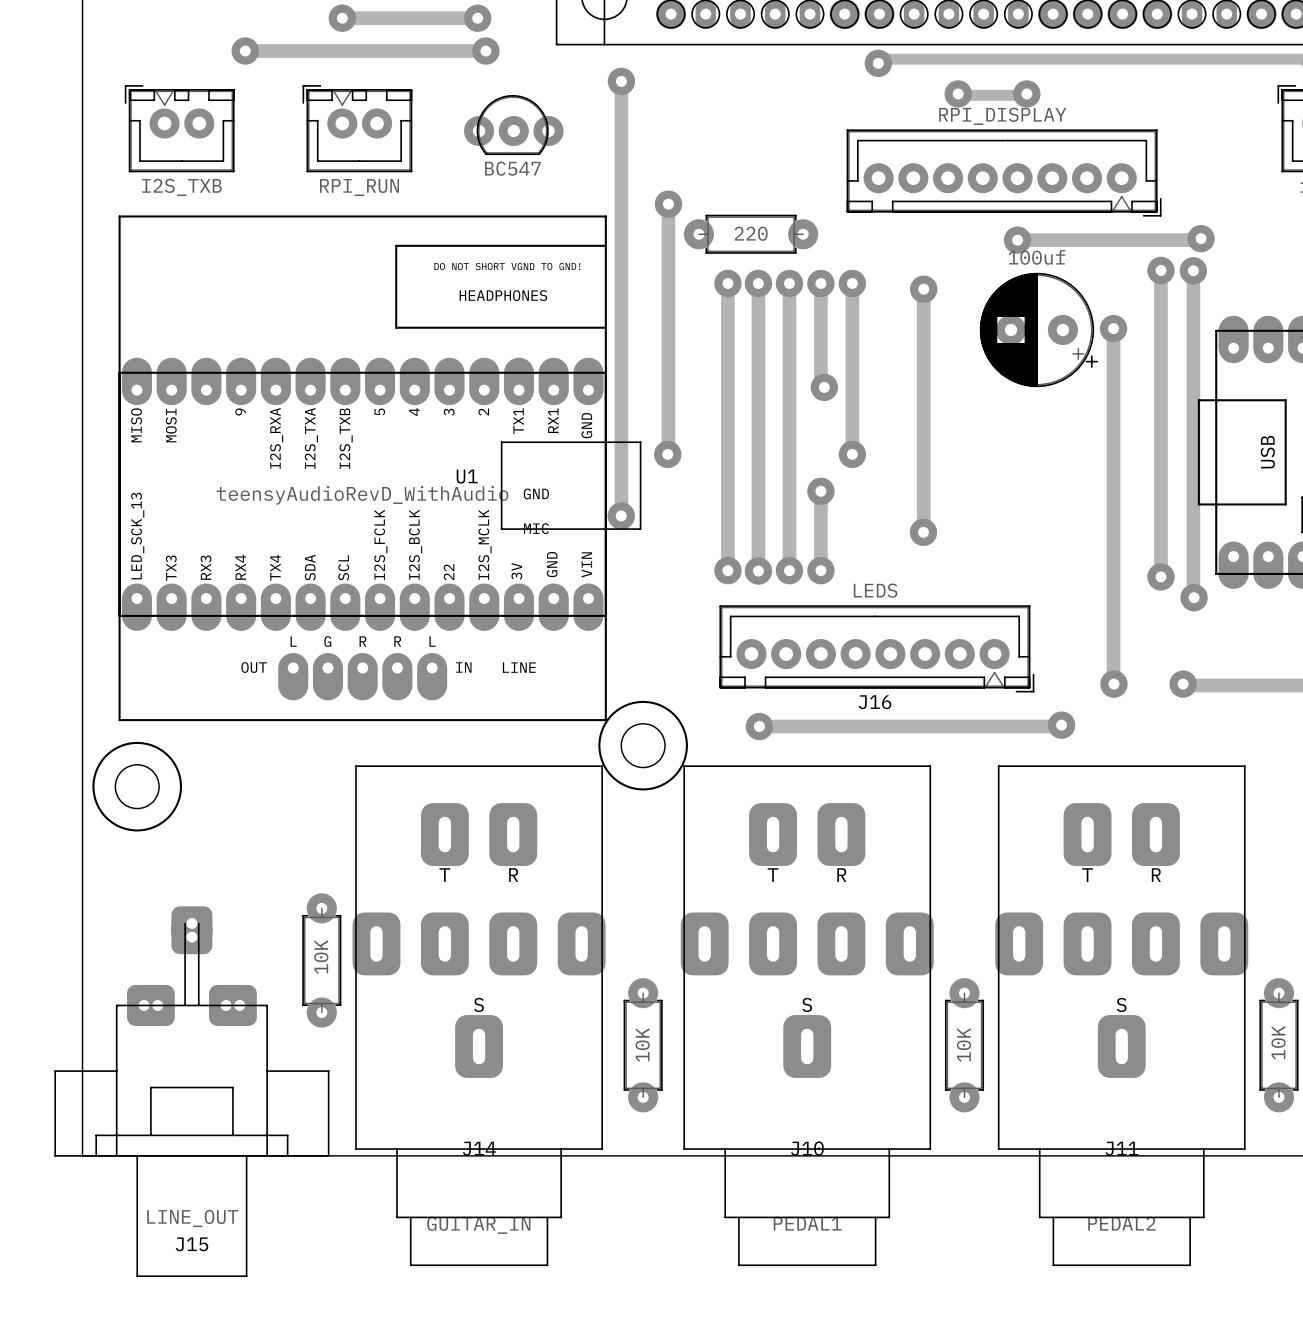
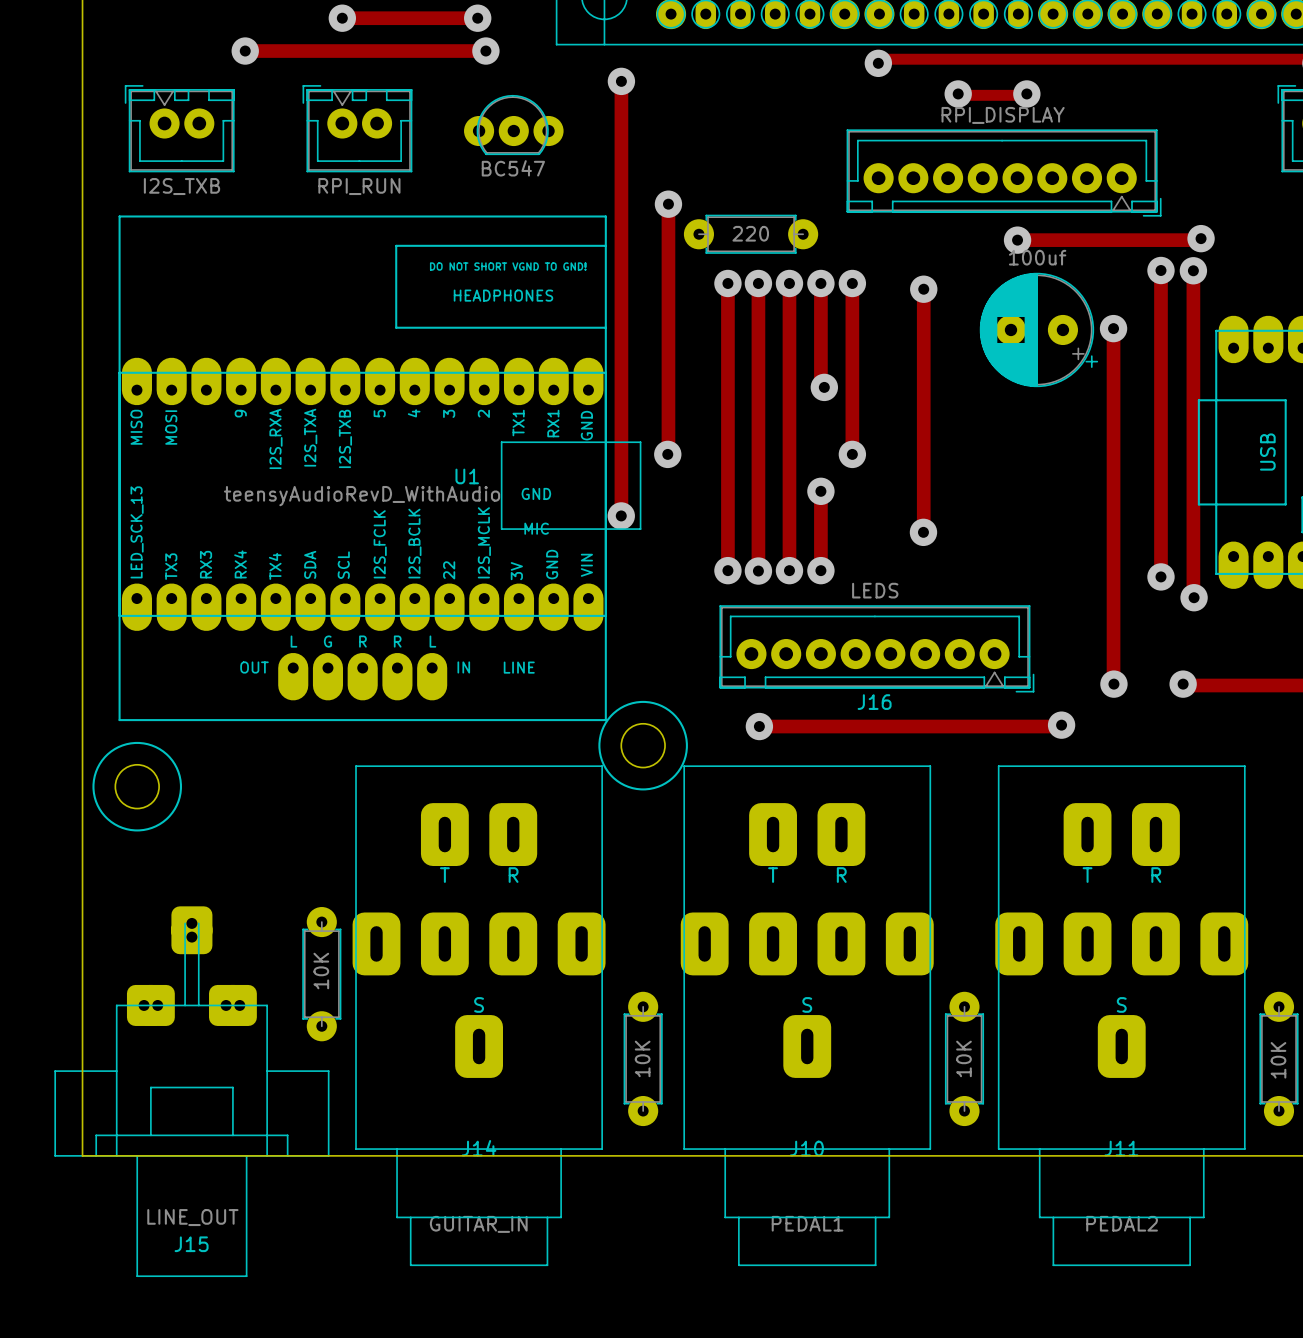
part position: (321, 960) -> (321, 974)
part position: (643, 1045) -> (643, 1058)
part position: (964, 1045) -> (964, 1058)
part position: (1278, 1045) -> (1278, 1058)

